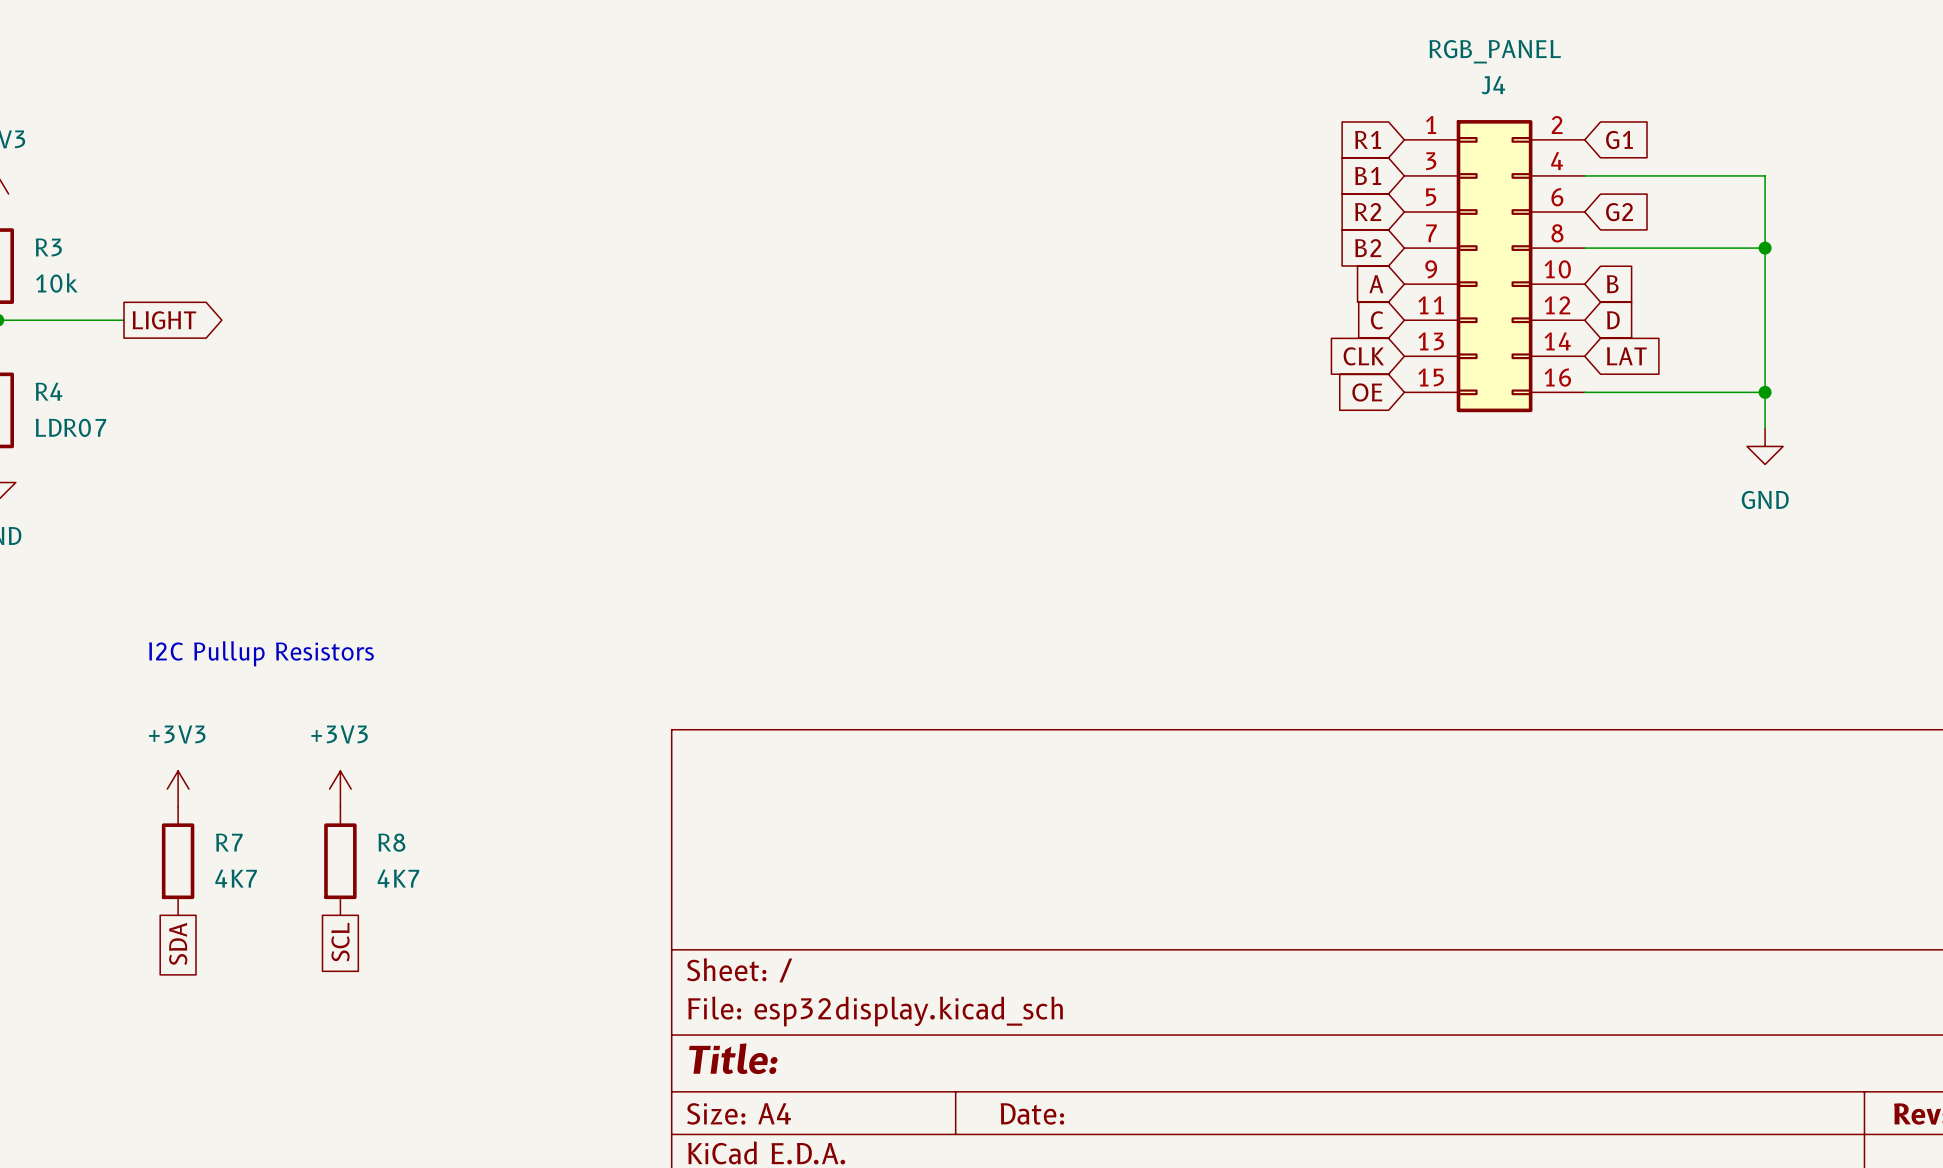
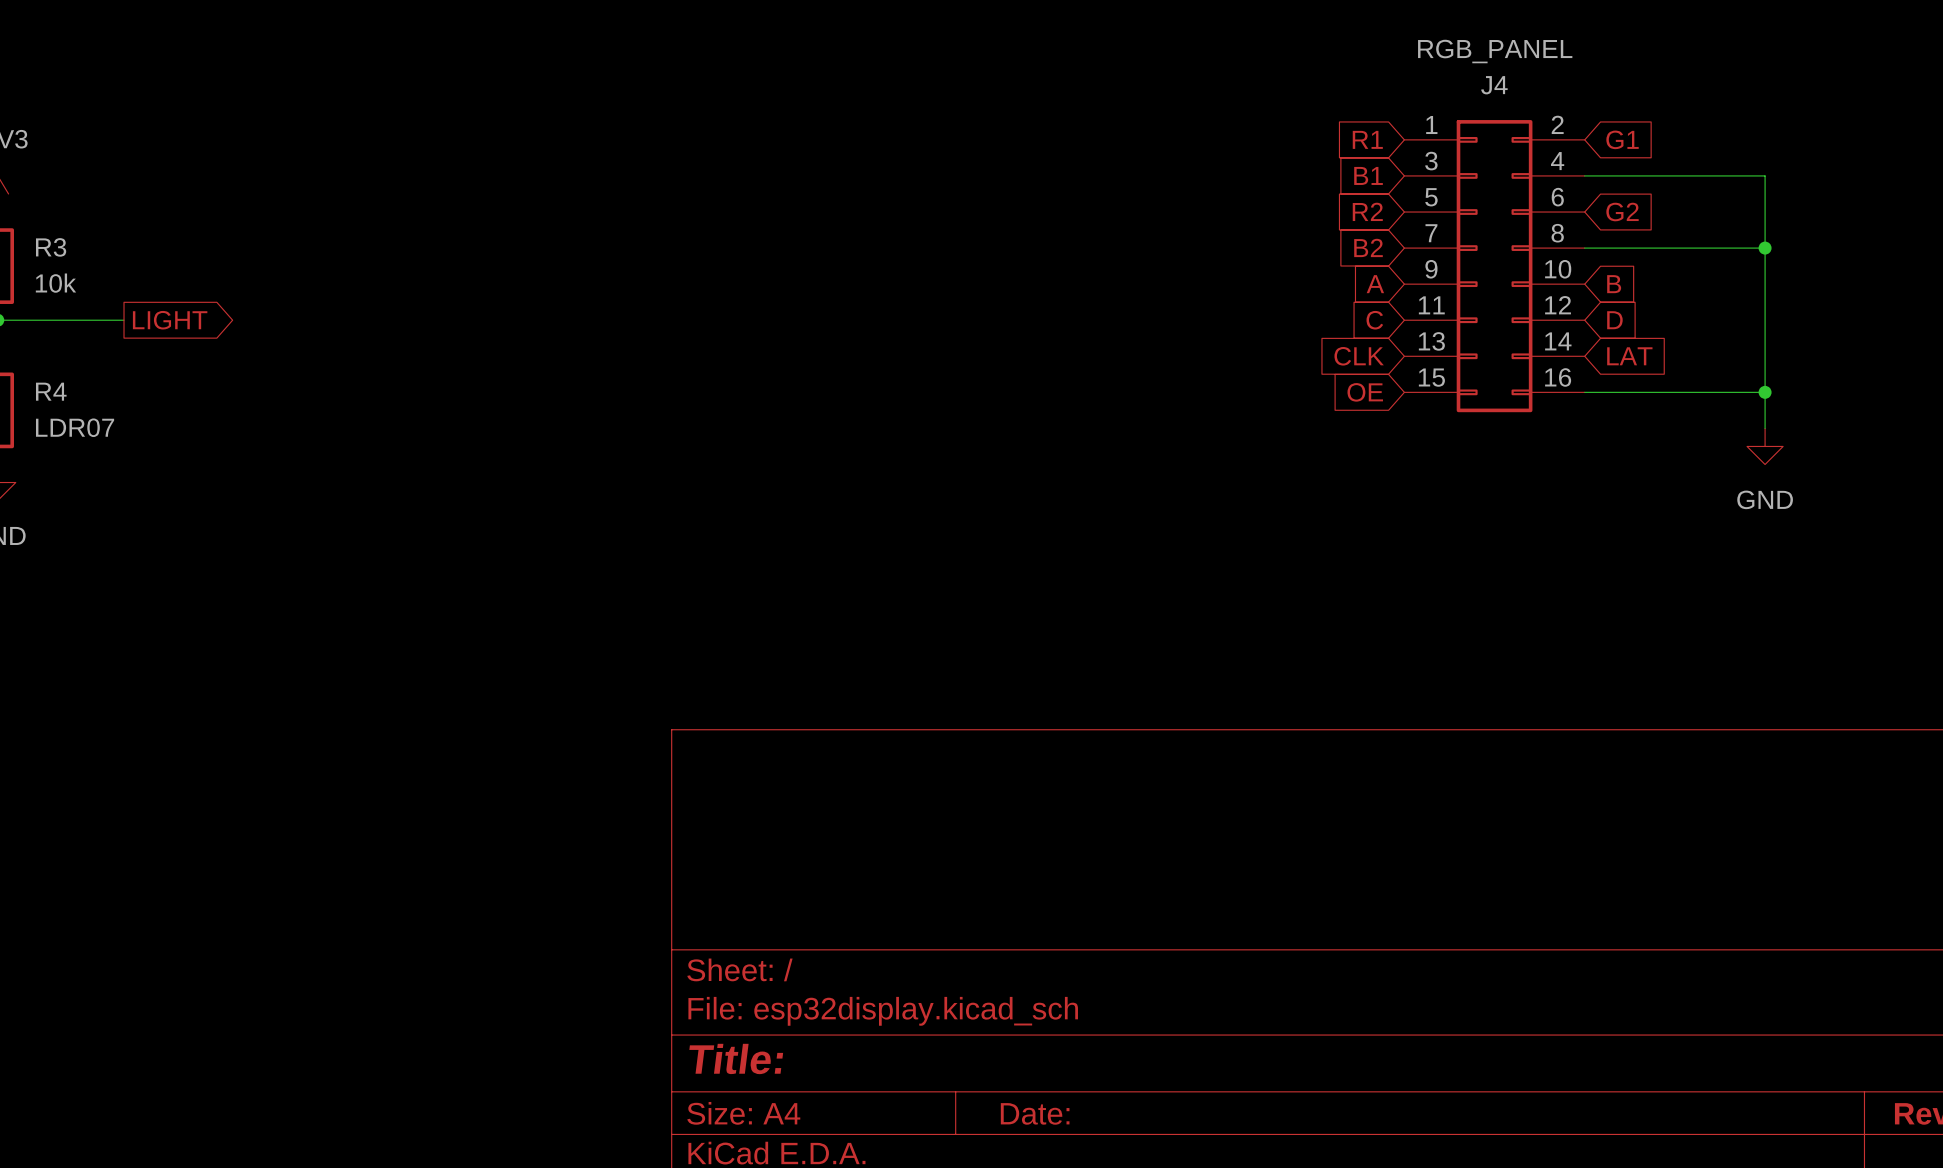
text: I2C Pullup Resistors (261, 653) -> none
power symbol: +3V3 (178, 789) -> none
power symbol: +3V3 (340, 789) -> none
R7: 4K7 (178, 861) -> none
R8: 4K7 (340, 861) -> none
global label: SCL (340, 942) -> none
global label: SDA (178, 943) -> none

